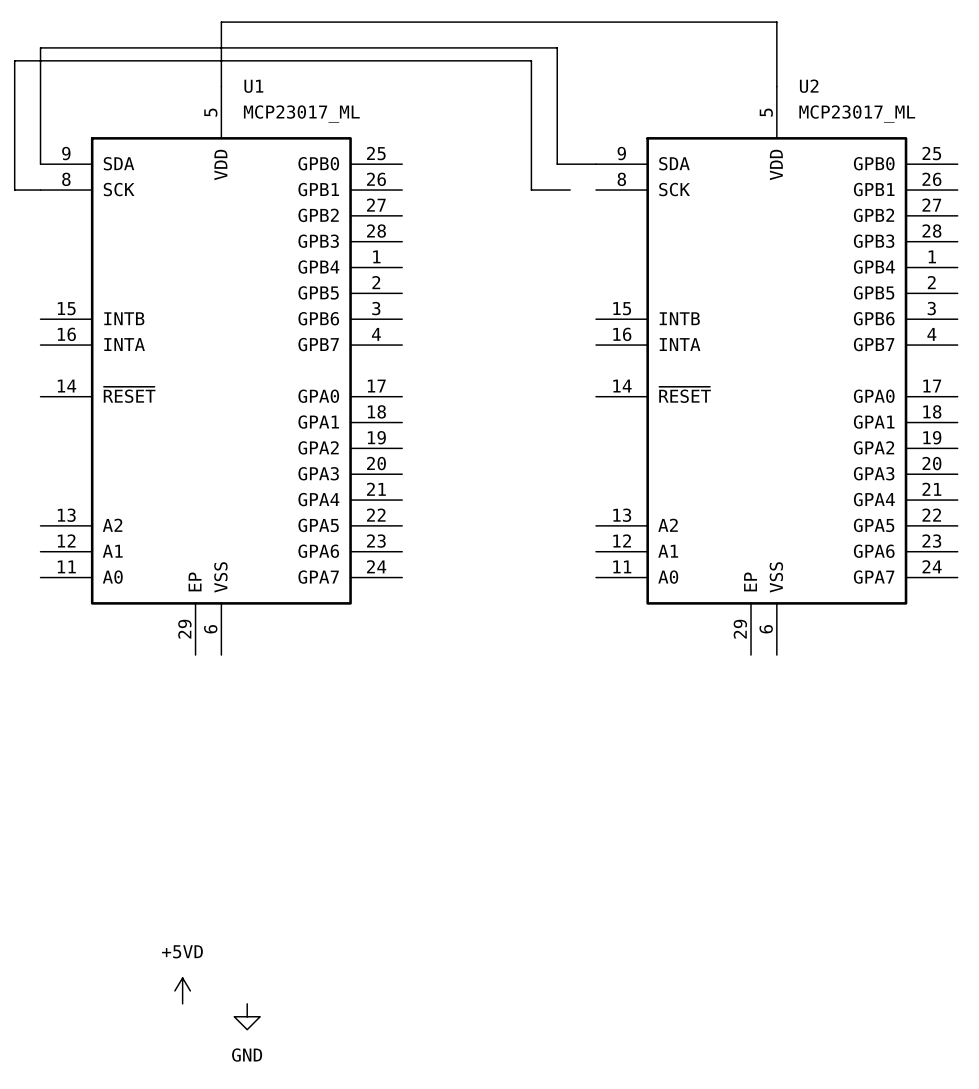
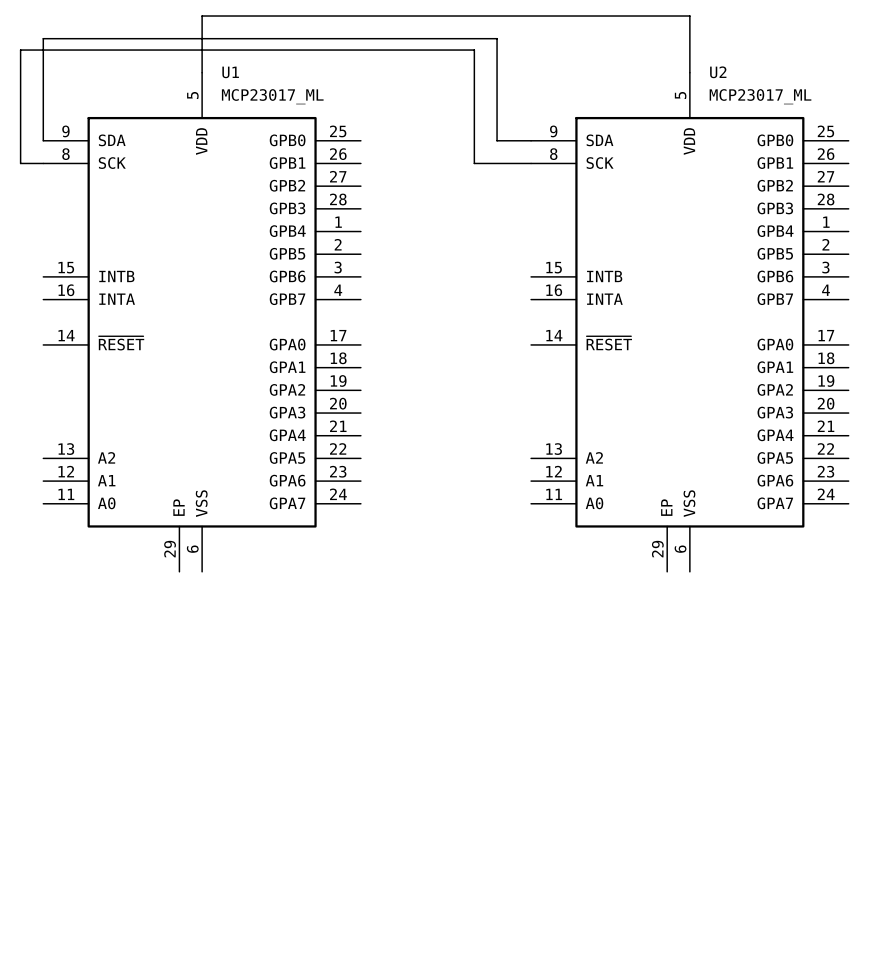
wire: none -> (508, 163) (531, 163)
power symbol: +5VD (182, 990) -> none
power symbol: GND (247, 1016) -> none

